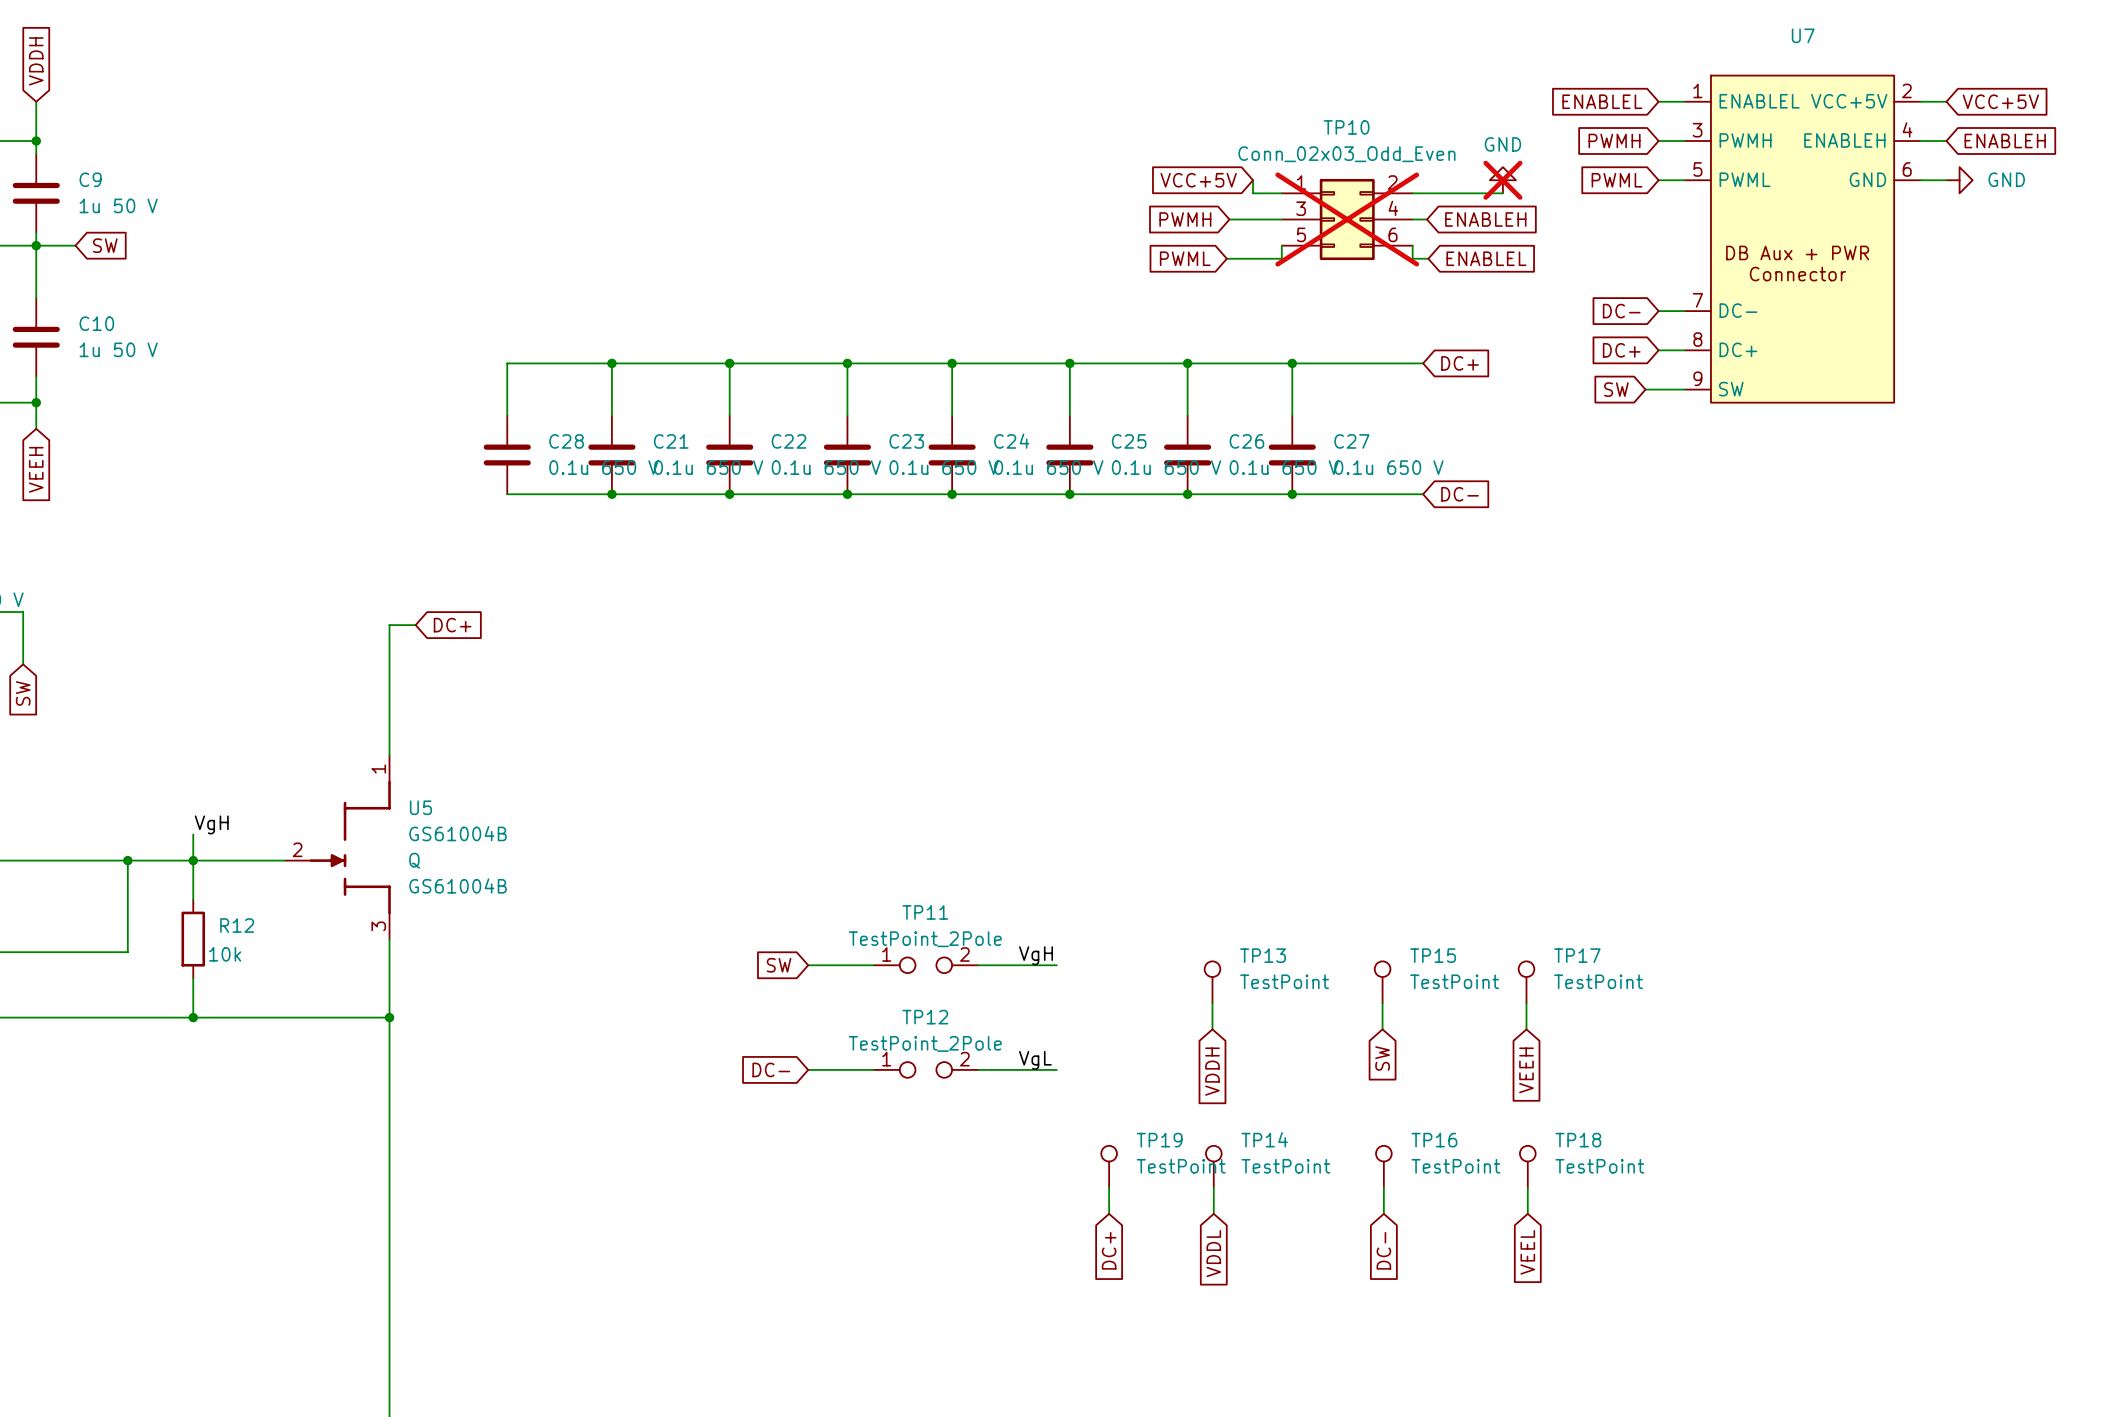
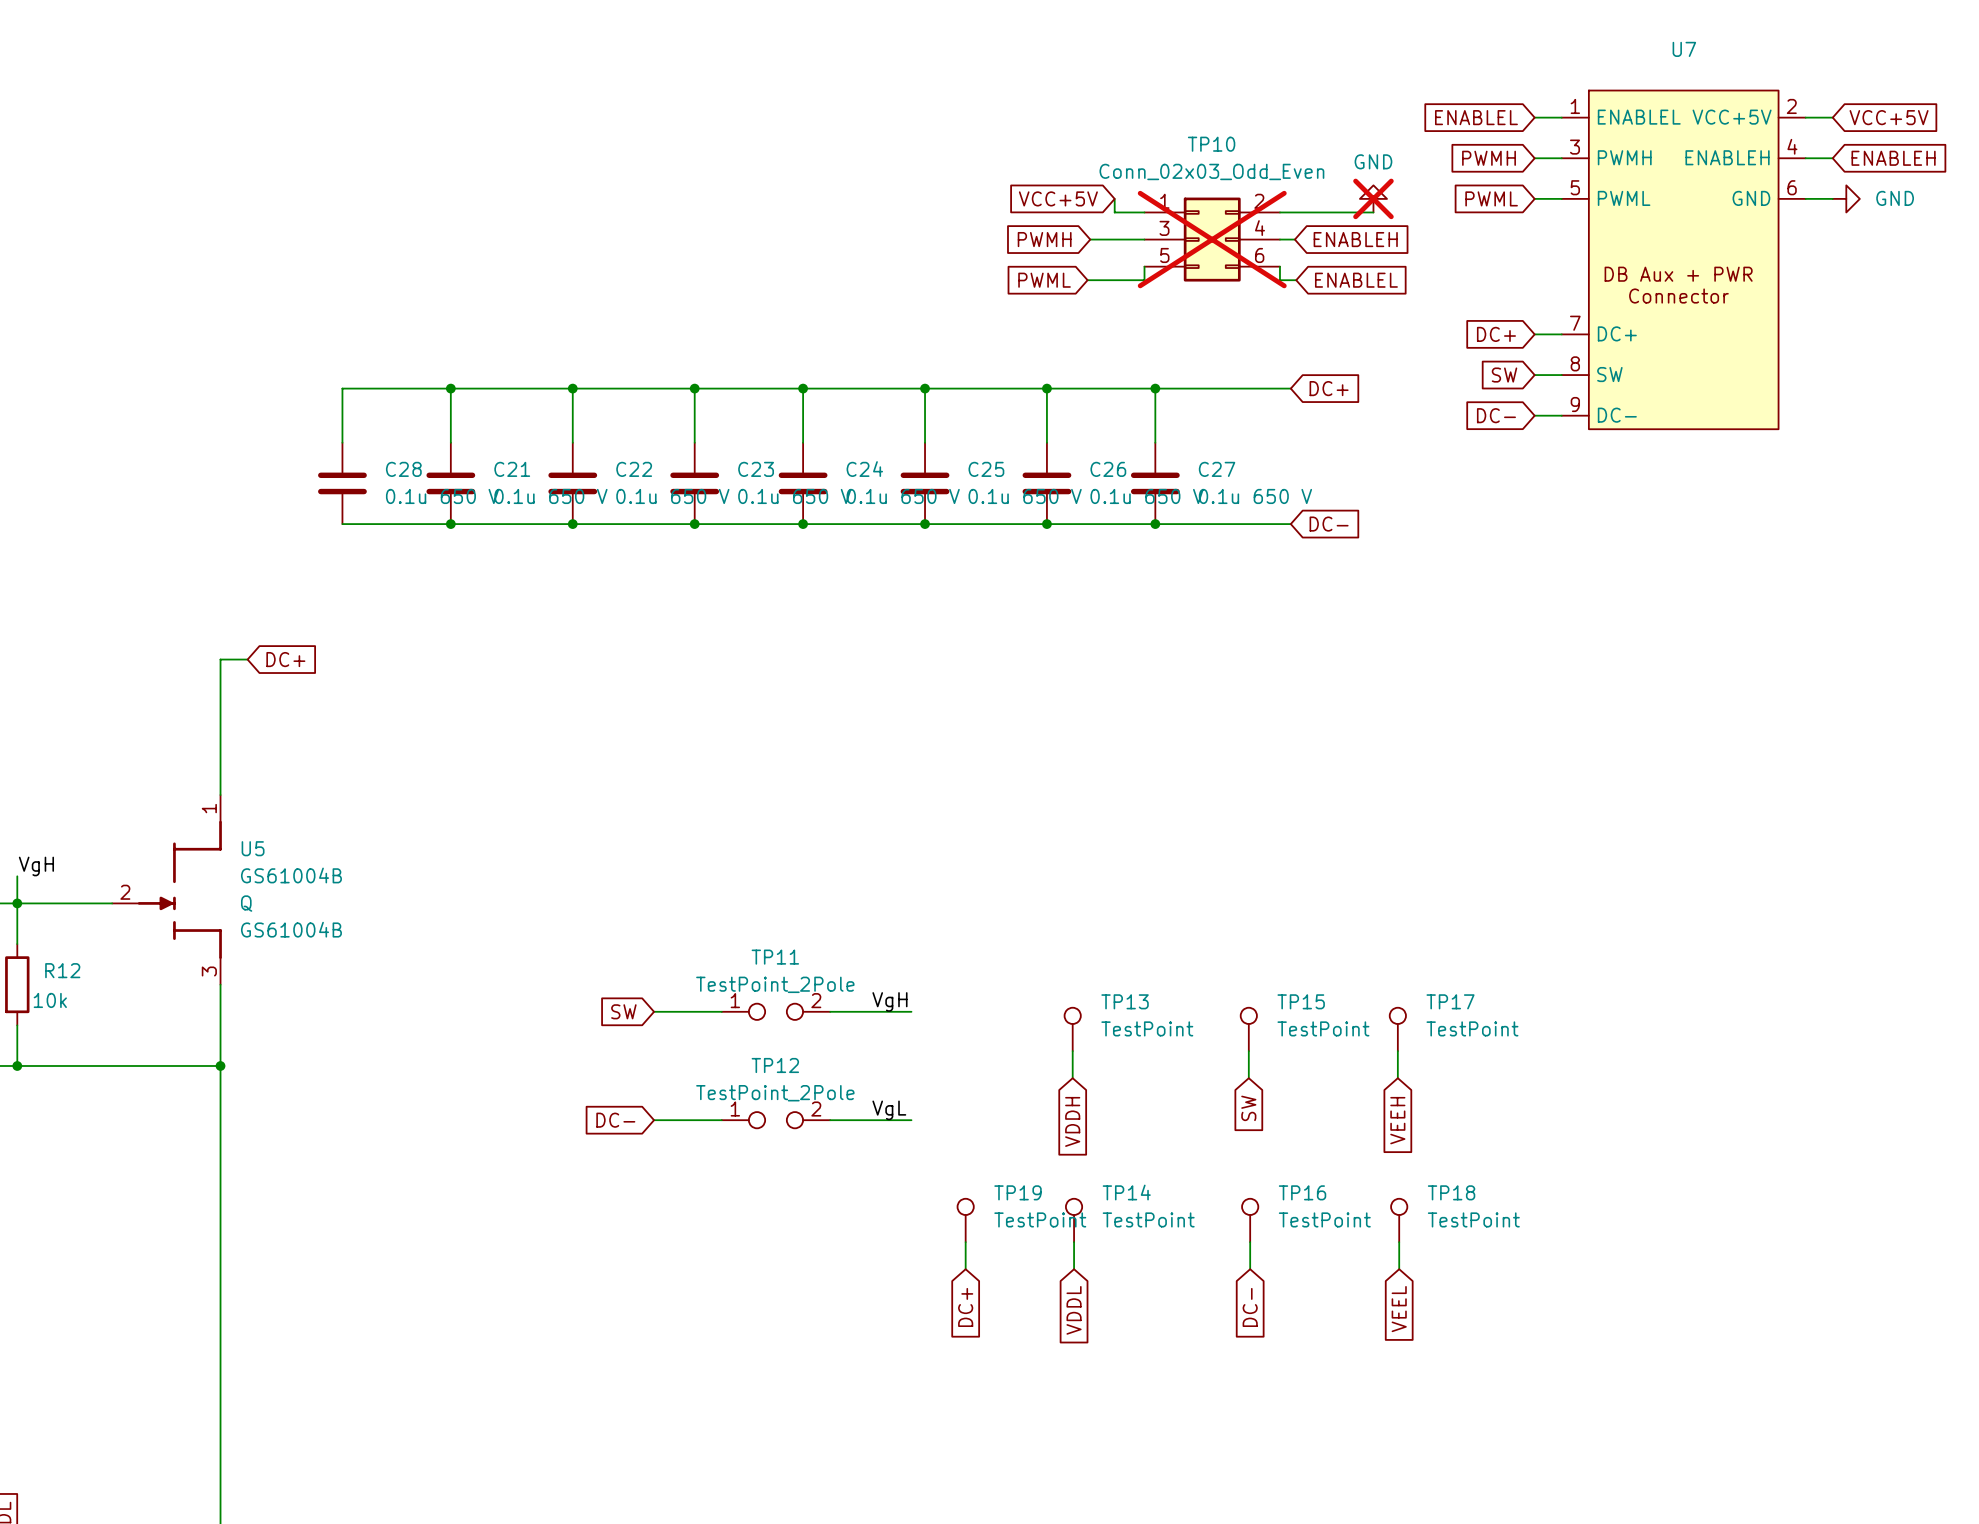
U7 pin name: DC- (1738, 310) -> DC+ (1617, 333)
global label: DC- (1621, 311) -> DC+ (1496, 334)
U7 pin name: DC+ (1738, 349) -> SW (1609, 374)
global label: DC+ (1621, 350) -> SW (1504, 375)
global label: SW (1616, 389) -> none
global label: none -> DC- (1496, 415)
wire: (1645, 389) (1658, 389) -> none
U7 pin name: SW (1731, 389) -> DC- (1617, 415)

